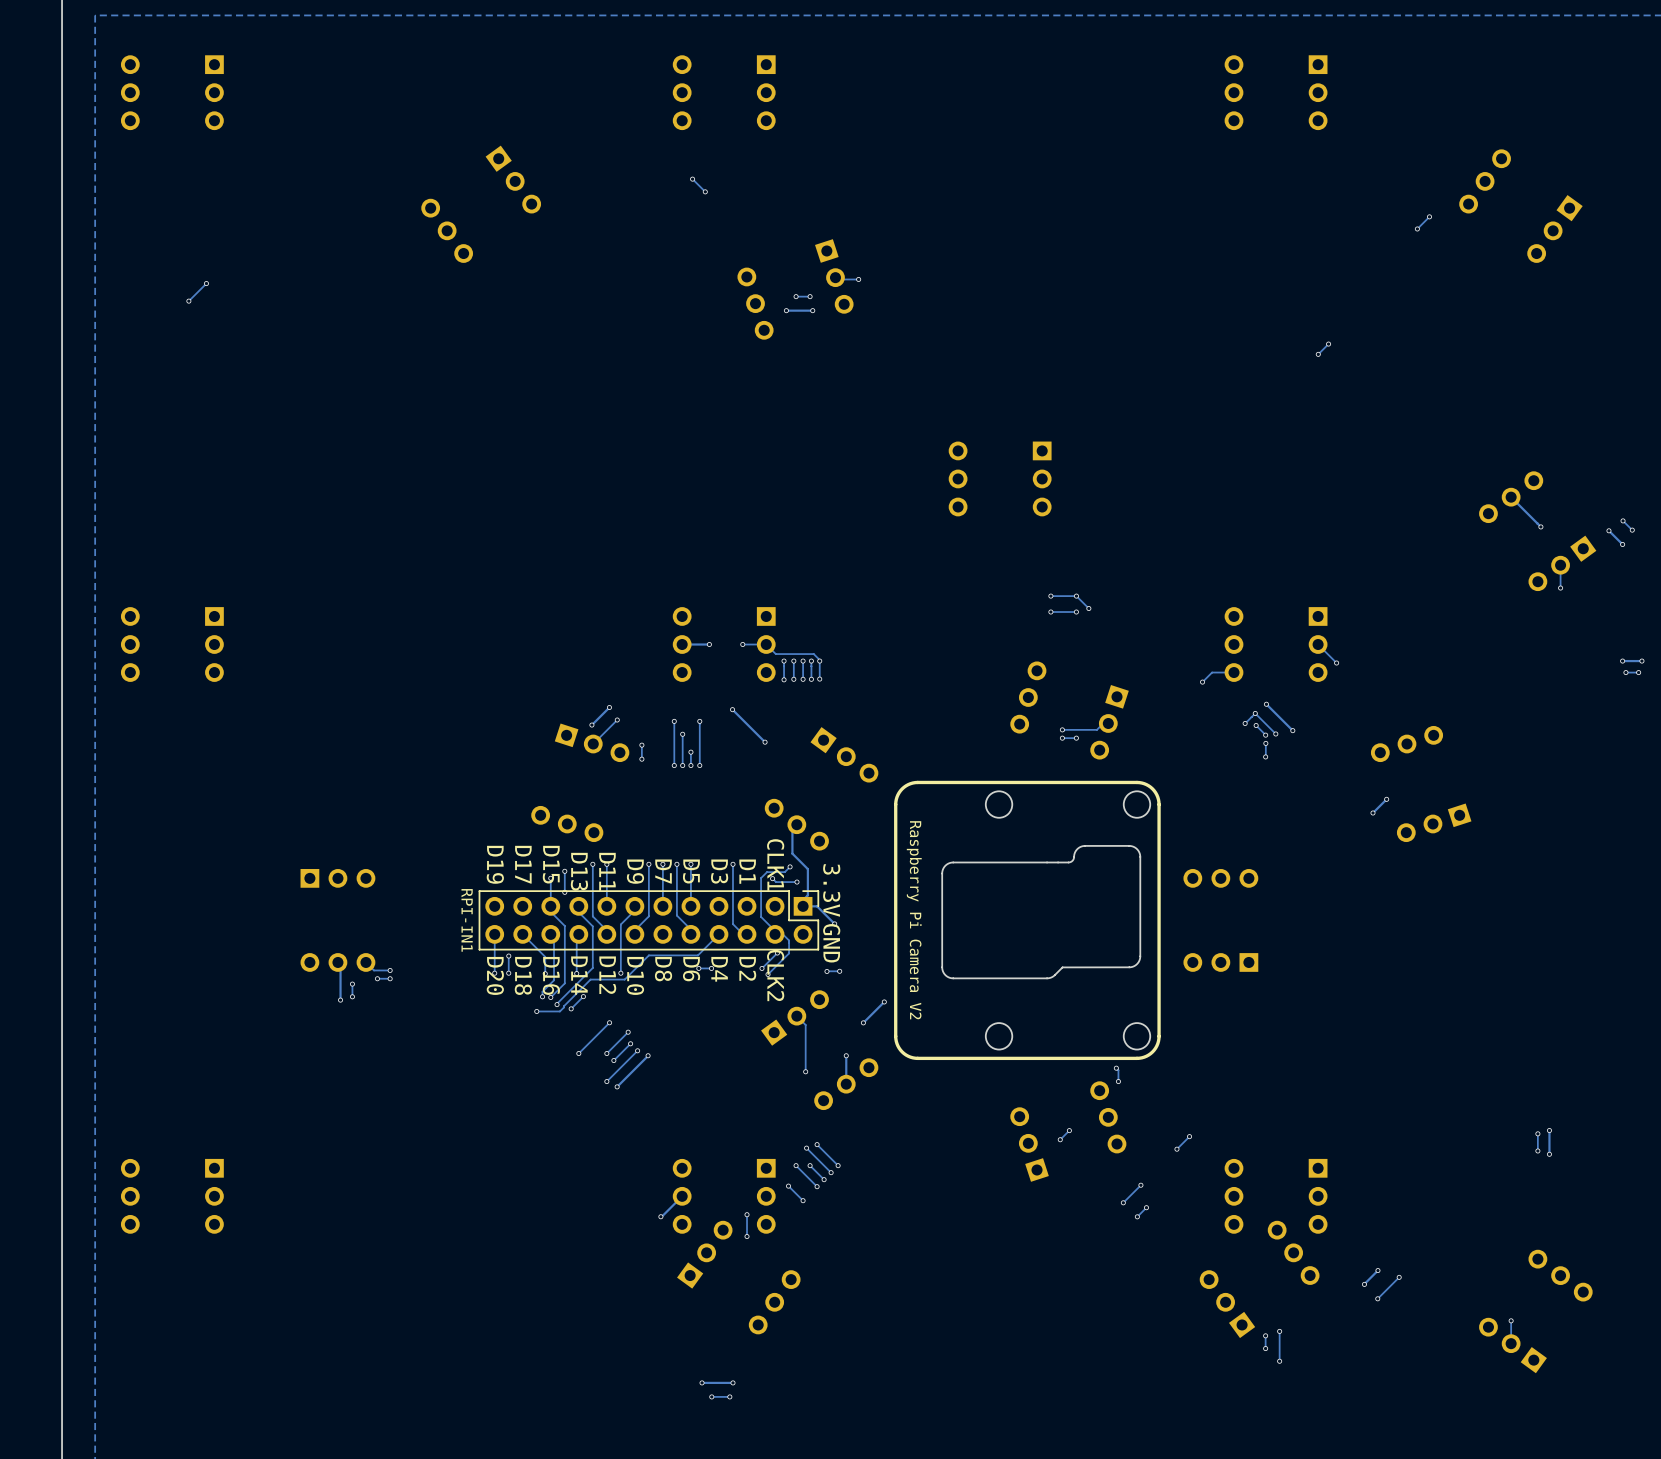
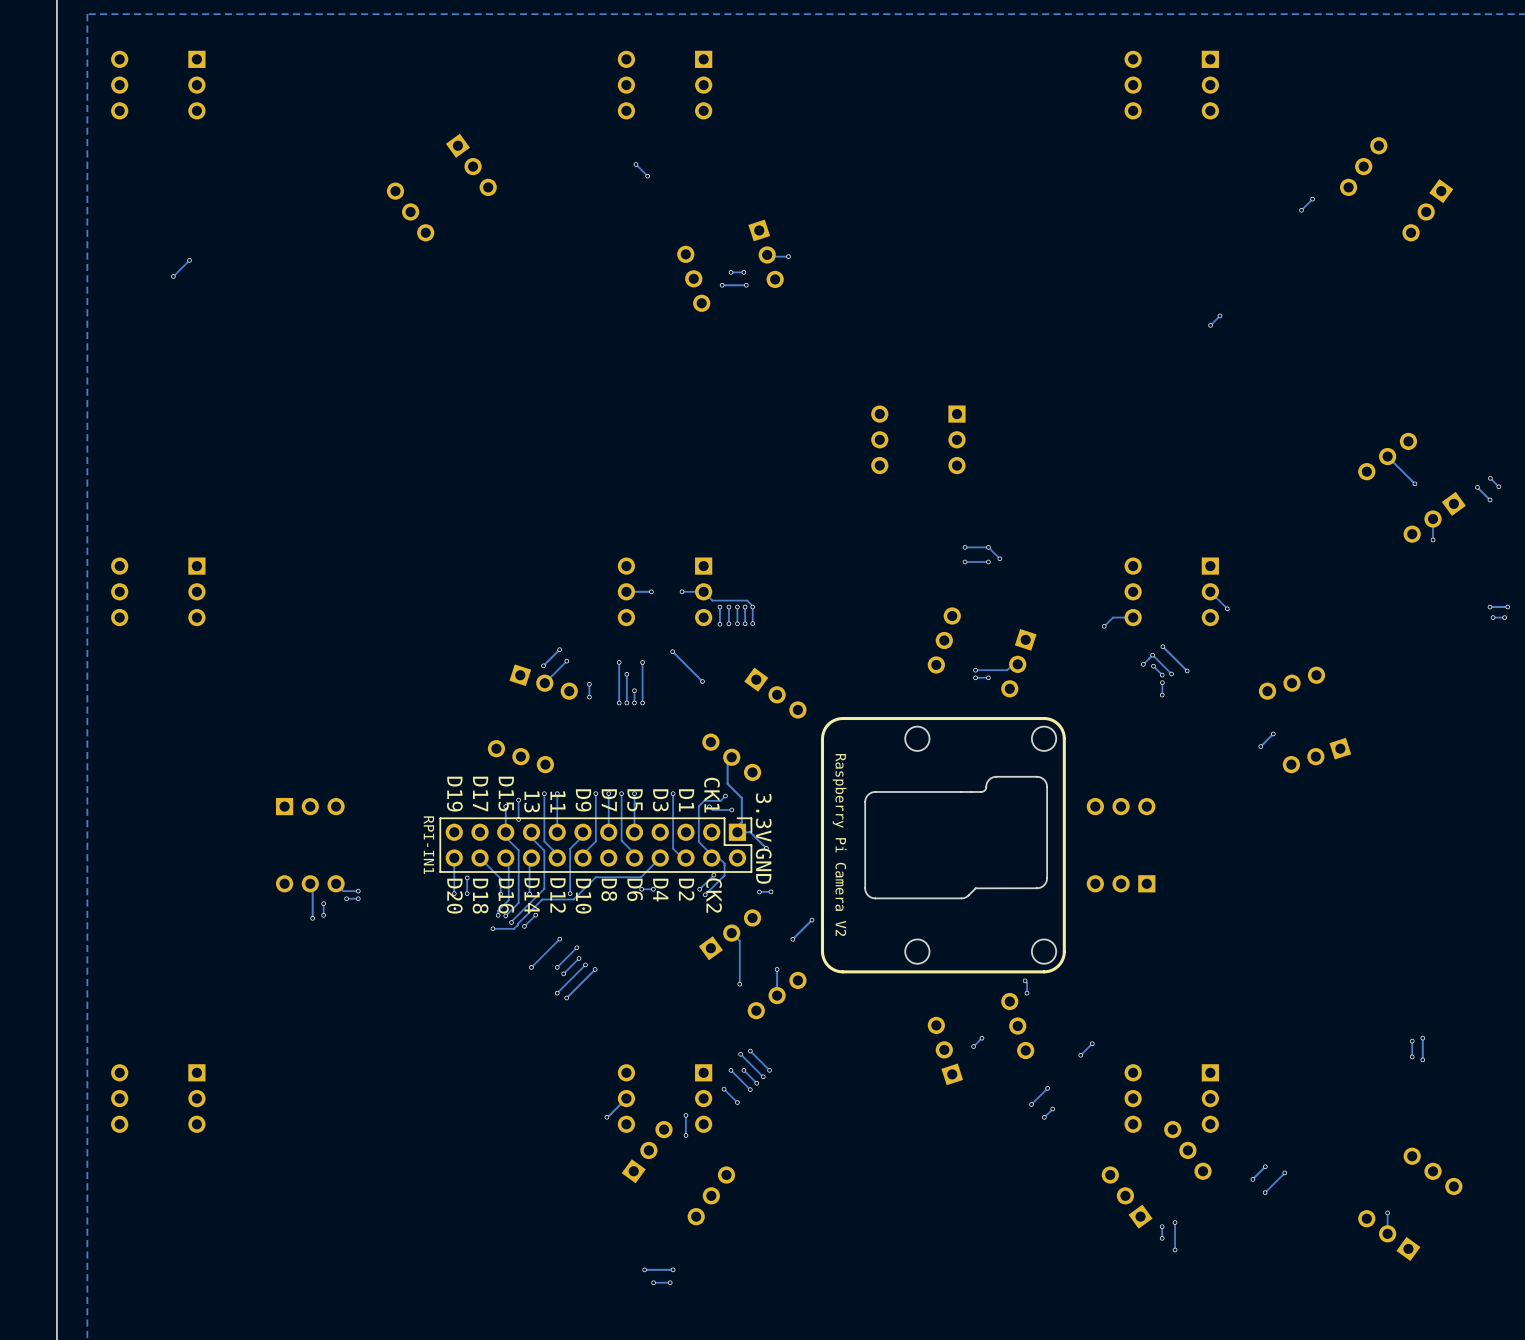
RPI-IN1 text: CLK1 (775, 864) -> none
RPI-IN1 text: none -> CK1 (712, 795)
RPI-IN1 text: D13 (579, 871) -> none
RPI-IN1 text: D11 (607, 871) -> none
RPI-IN1 text: none -> 13 (532, 801)
RPI-IN1 text: none -> 11 (557, 802)
RPI-IN1 text: CLK2 (775, 975) -> none
RPI-IN1 text: none -> CK2 (714, 895)

